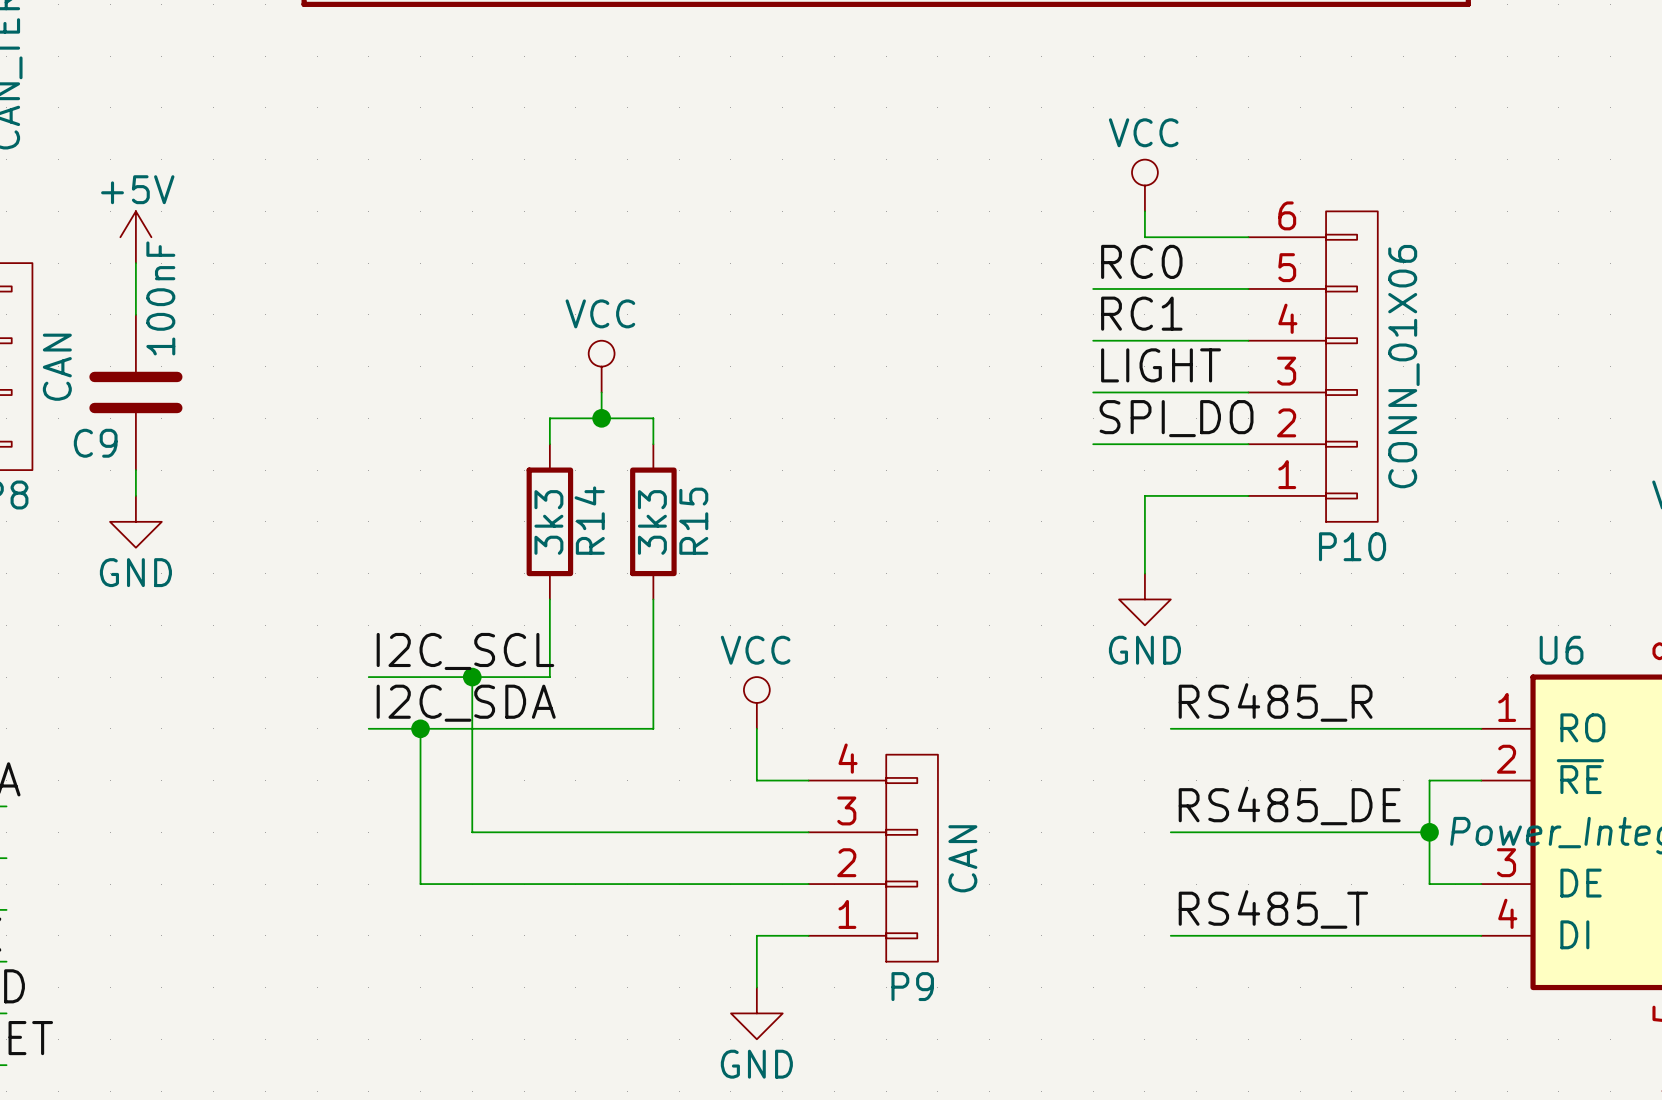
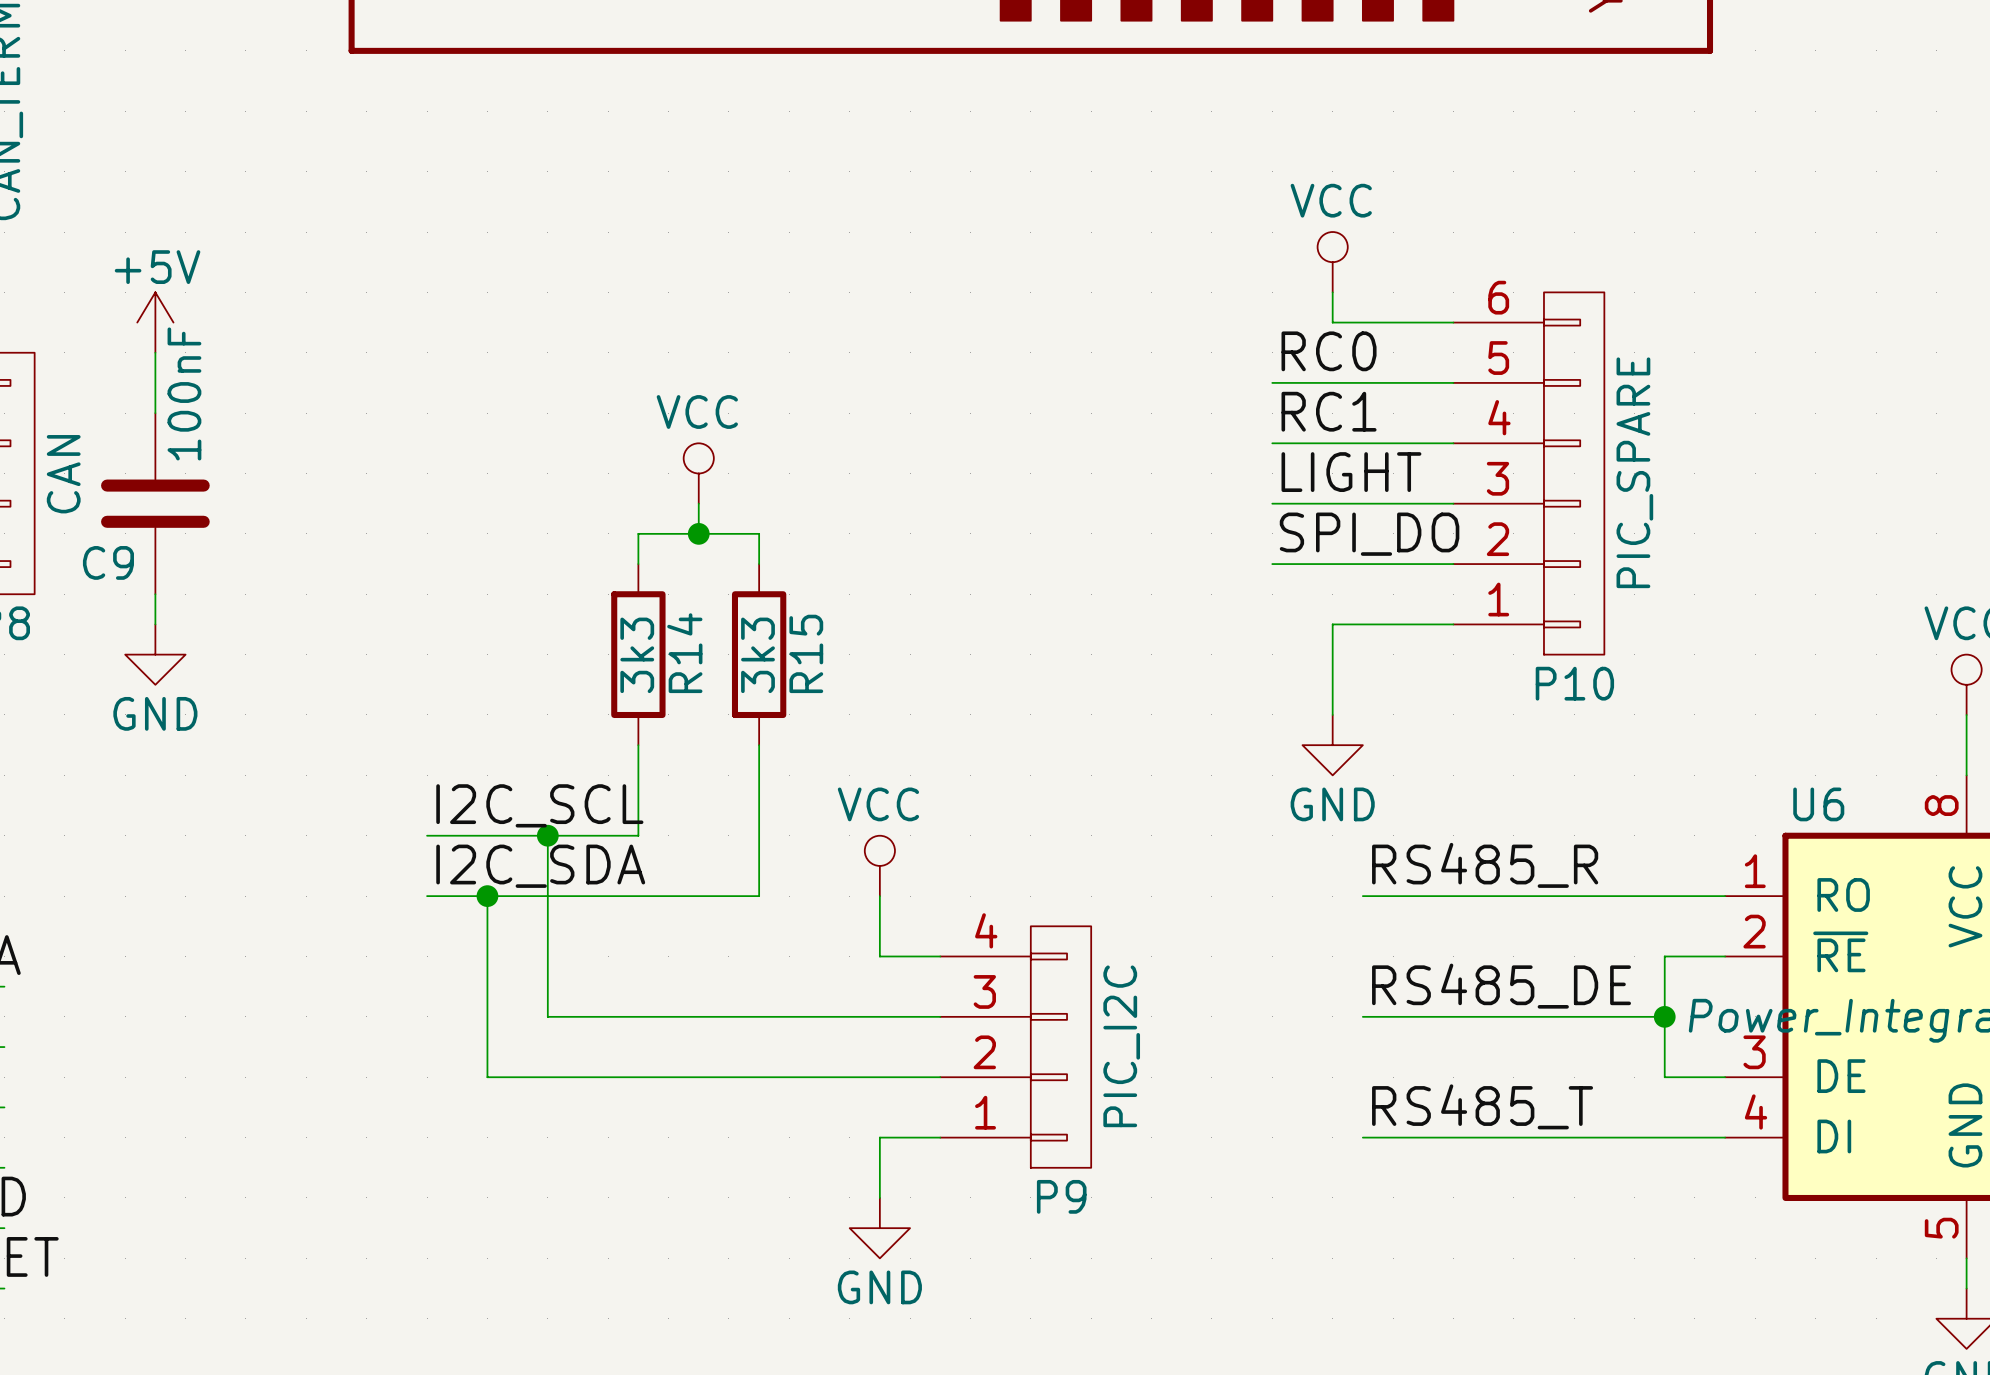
P10 value: CONN_01X06 (1403, 366) -> PIC_SPARE (1634, 472)
P9 value: CAN (962, 858) -> PIC_I2C (1121, 1046)

